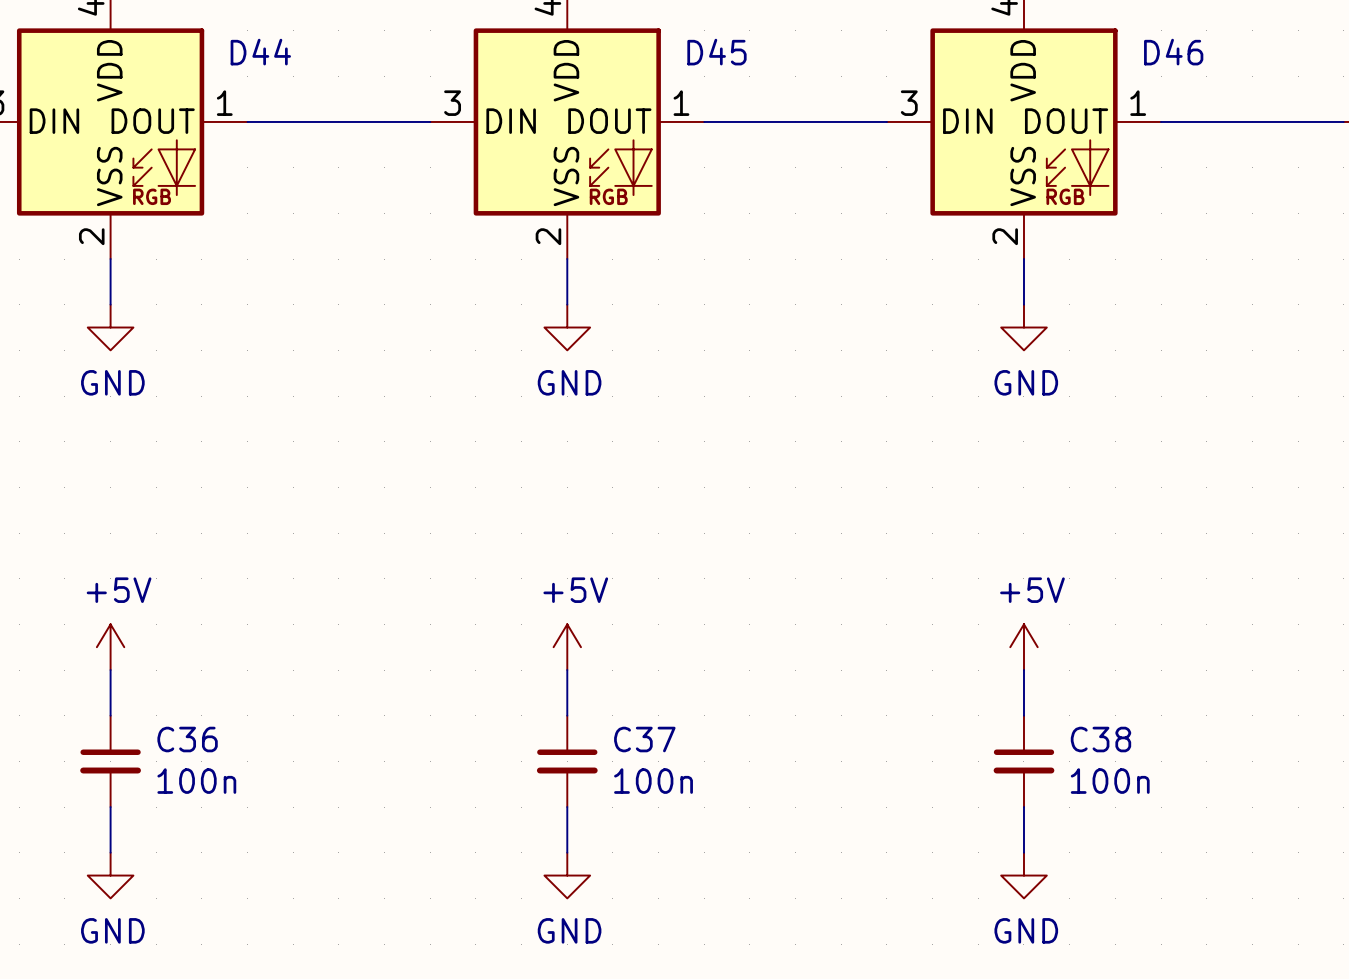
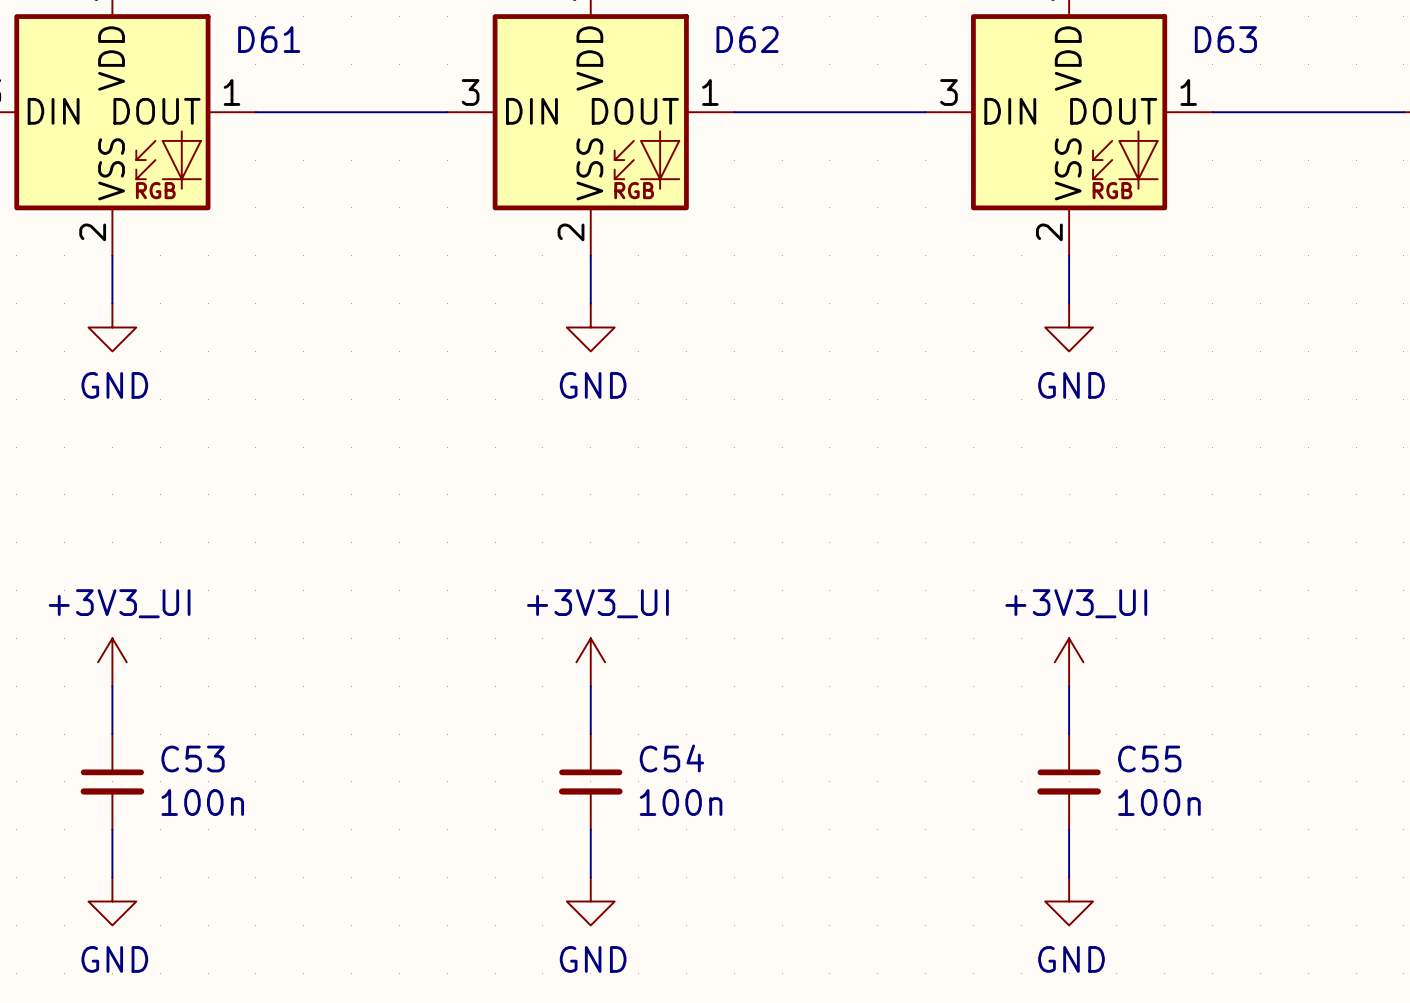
D44 name: D44 (260, 52) -> D61 (269, 39)
D45 name: D45 (716, 52) -> D62 (747, 39)
D46 name: D46 (1173, 52) -> D63 (1225, 39)
power symbol: +5V (110, 647) -> +3V3_UI (112, 662)
power symbol: +5V (567, 647) -> +3V3_UI (590, 662)
power symbol: +5V (1023, 647) -> +3V3_UI (1069, 662)
C36 name: C36 (187, 739) -> C53 (193, 759)
C37 name: C37 (644, 739) -> C54 (671, 758)
C38 name: C38 (1100, 739) -> C55 (1149, 759)

